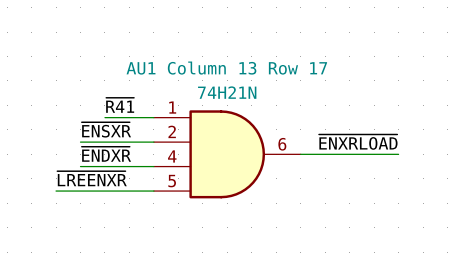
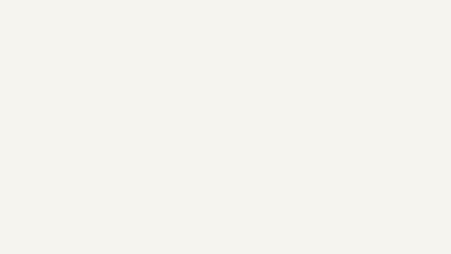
label: ~{R41} (120, 105) -> none
wire: (104, 117) (153, 117) -> none
label: ~{ENSXR} (106, 129) -> none
wire: (80, 142) (153, 142) -> none
label: ~{ENXRLOAD} (358, 142) -> none
label: ~{ENDXR} (106, 154) -> none
part: 74H21N (227, 154) -> none
wire: (300, 154) (398, 154) -> none
wire: (80, 166) (153, 166) -> none
label: ~{LREENXR} (92, 178) -> none
wire: (56, 191) (153, 191) -> none

